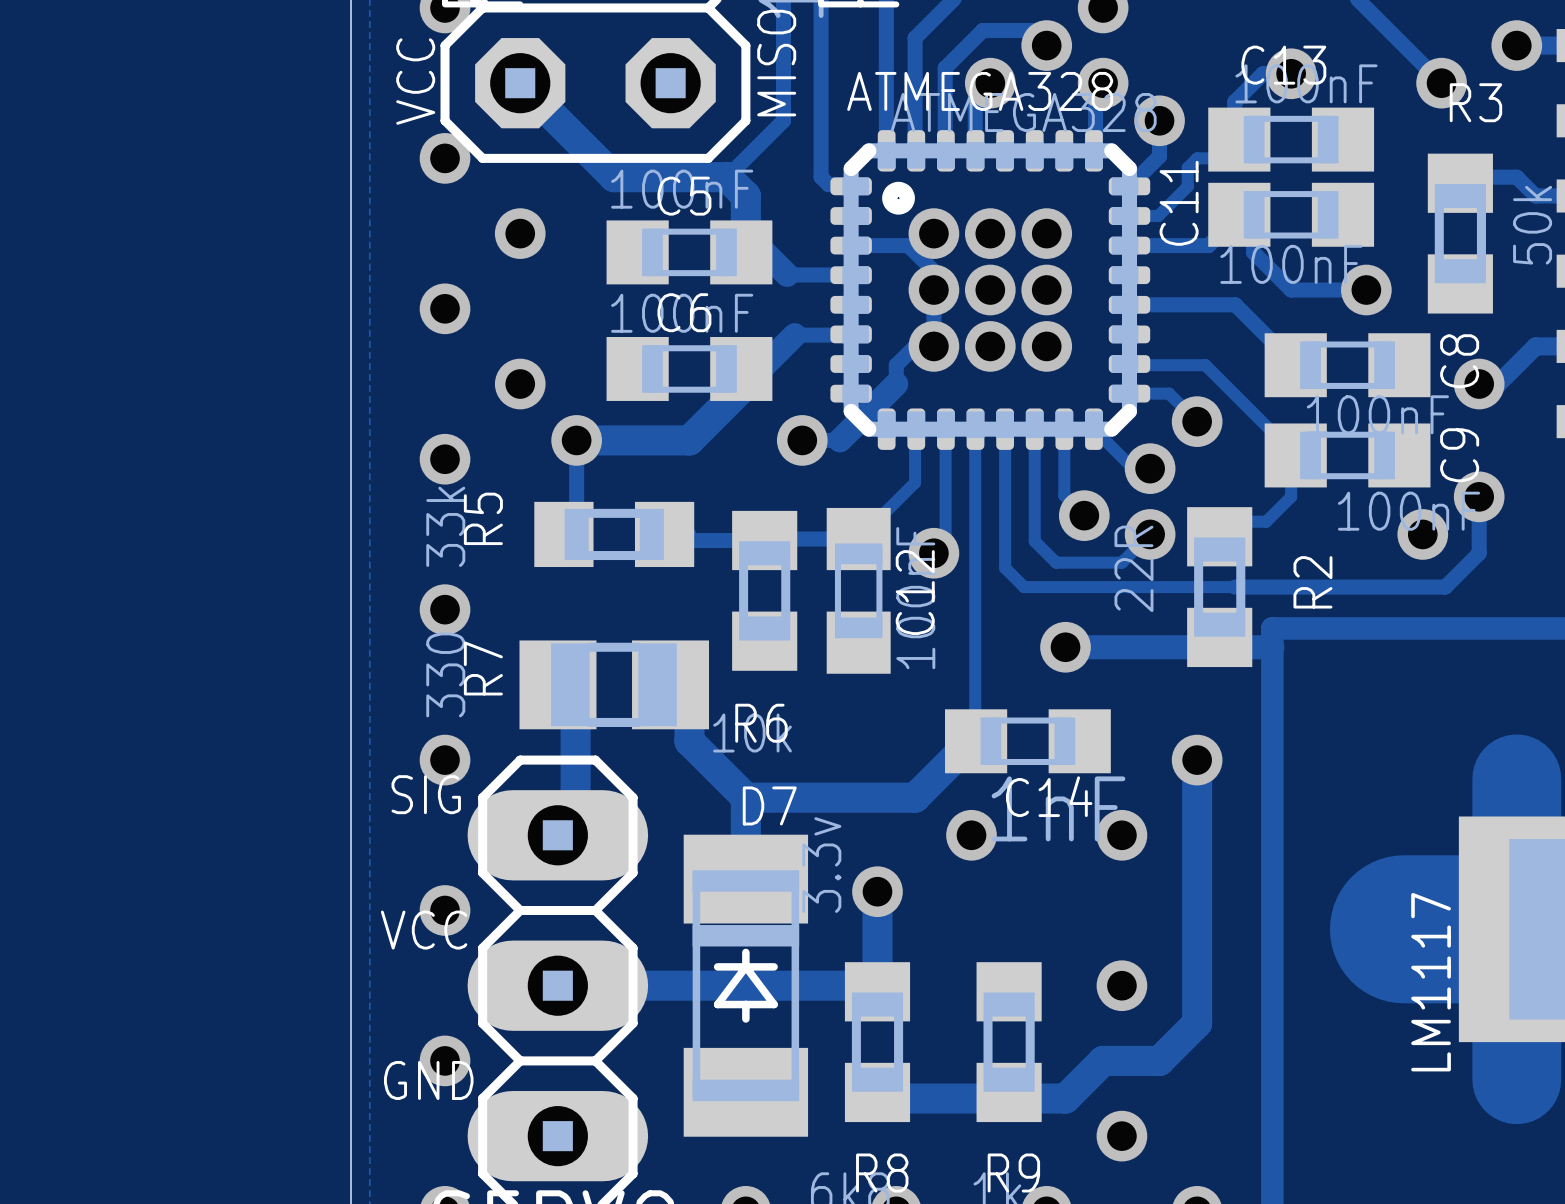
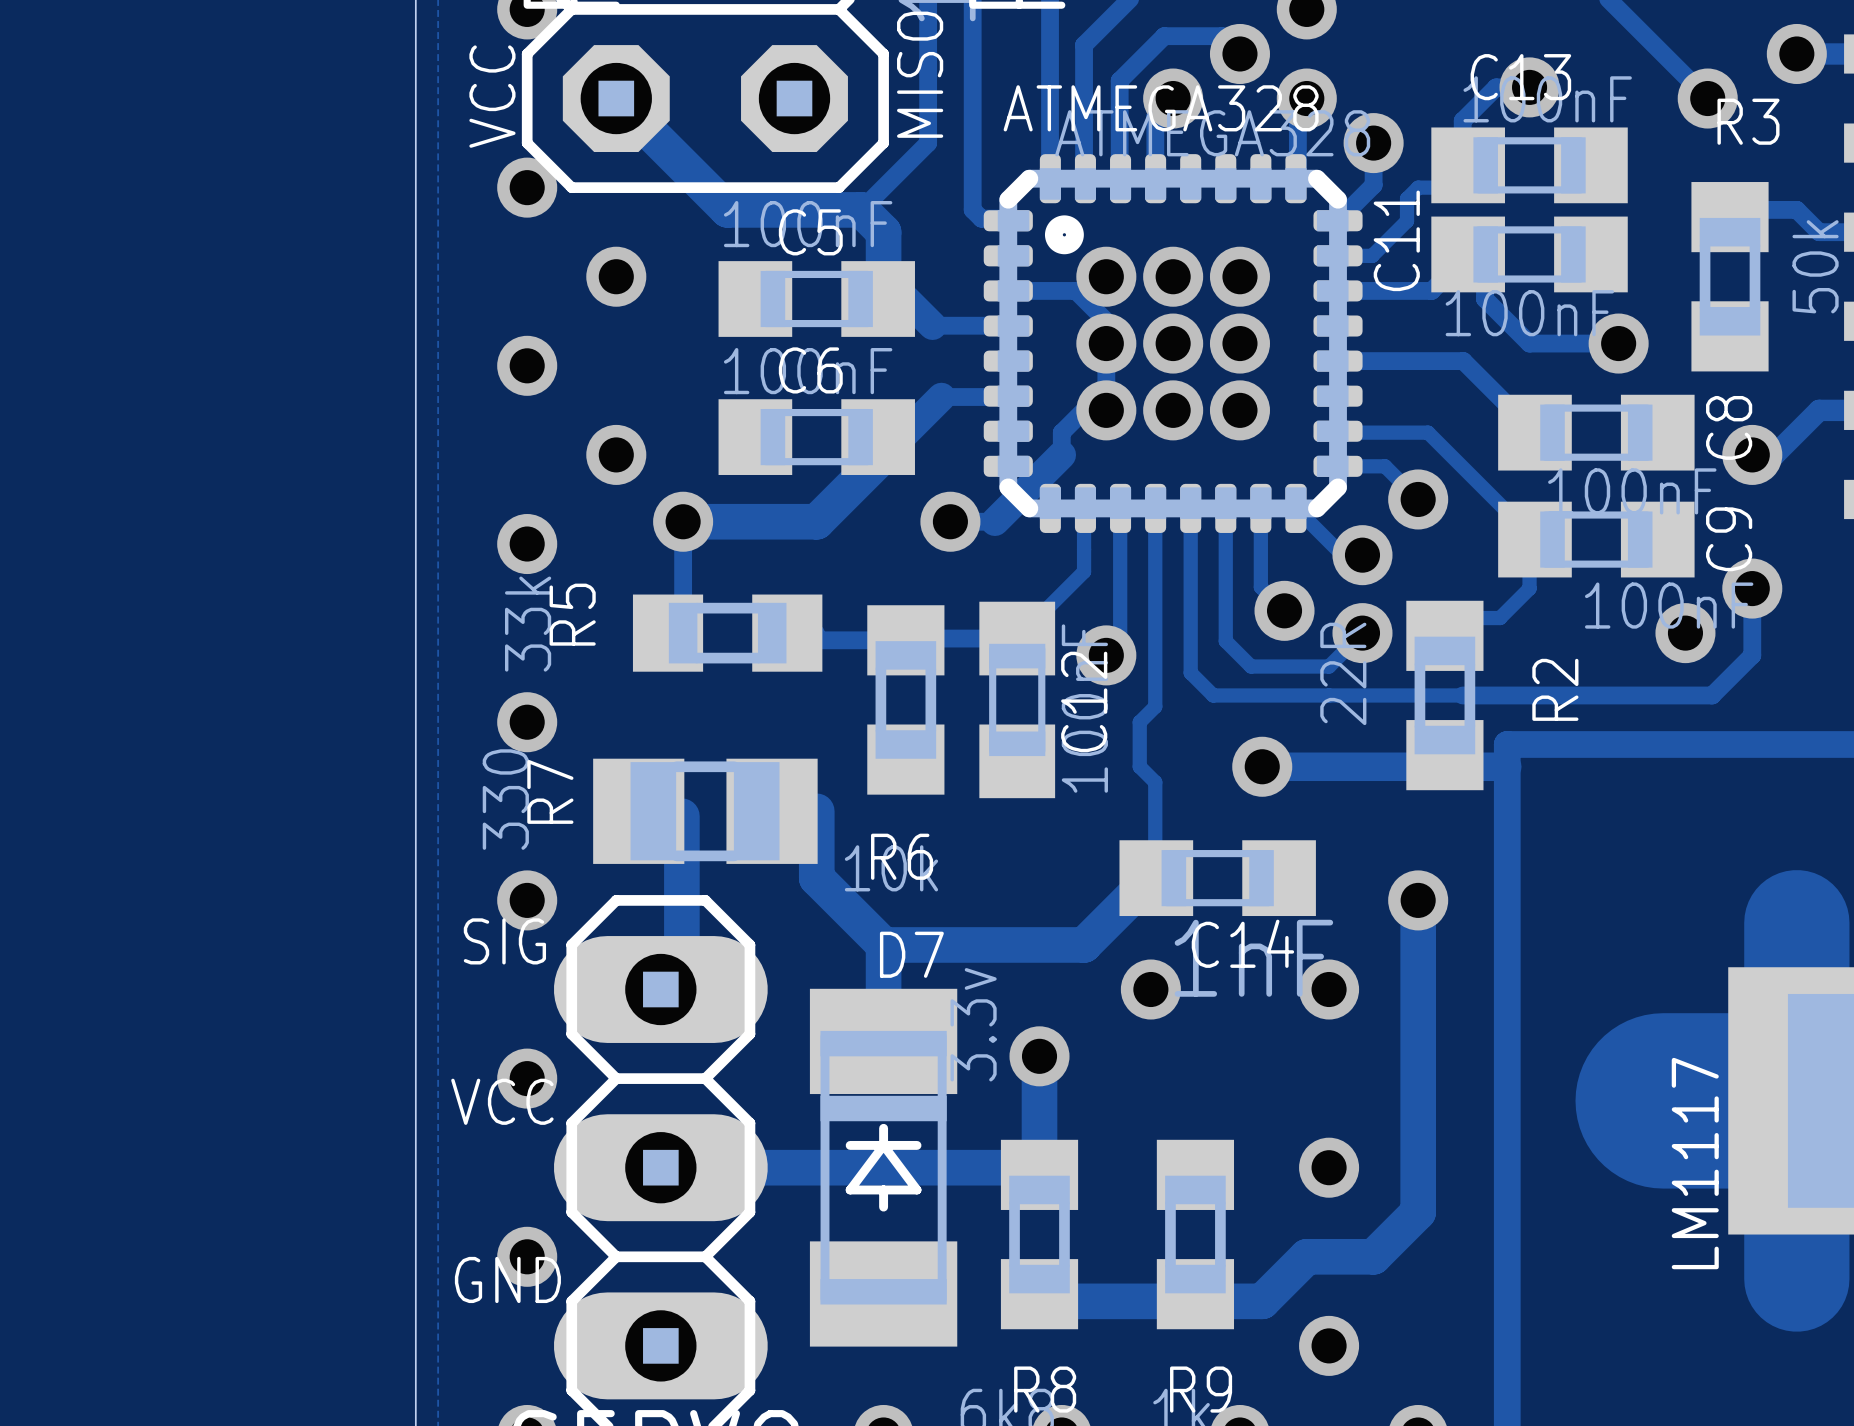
track: (975, 596) (975, 660) -> (1155, 706) (1139, 722) (1139, 766) (1155, 782)
R7 position: (614, 684) -> (705, 811)

